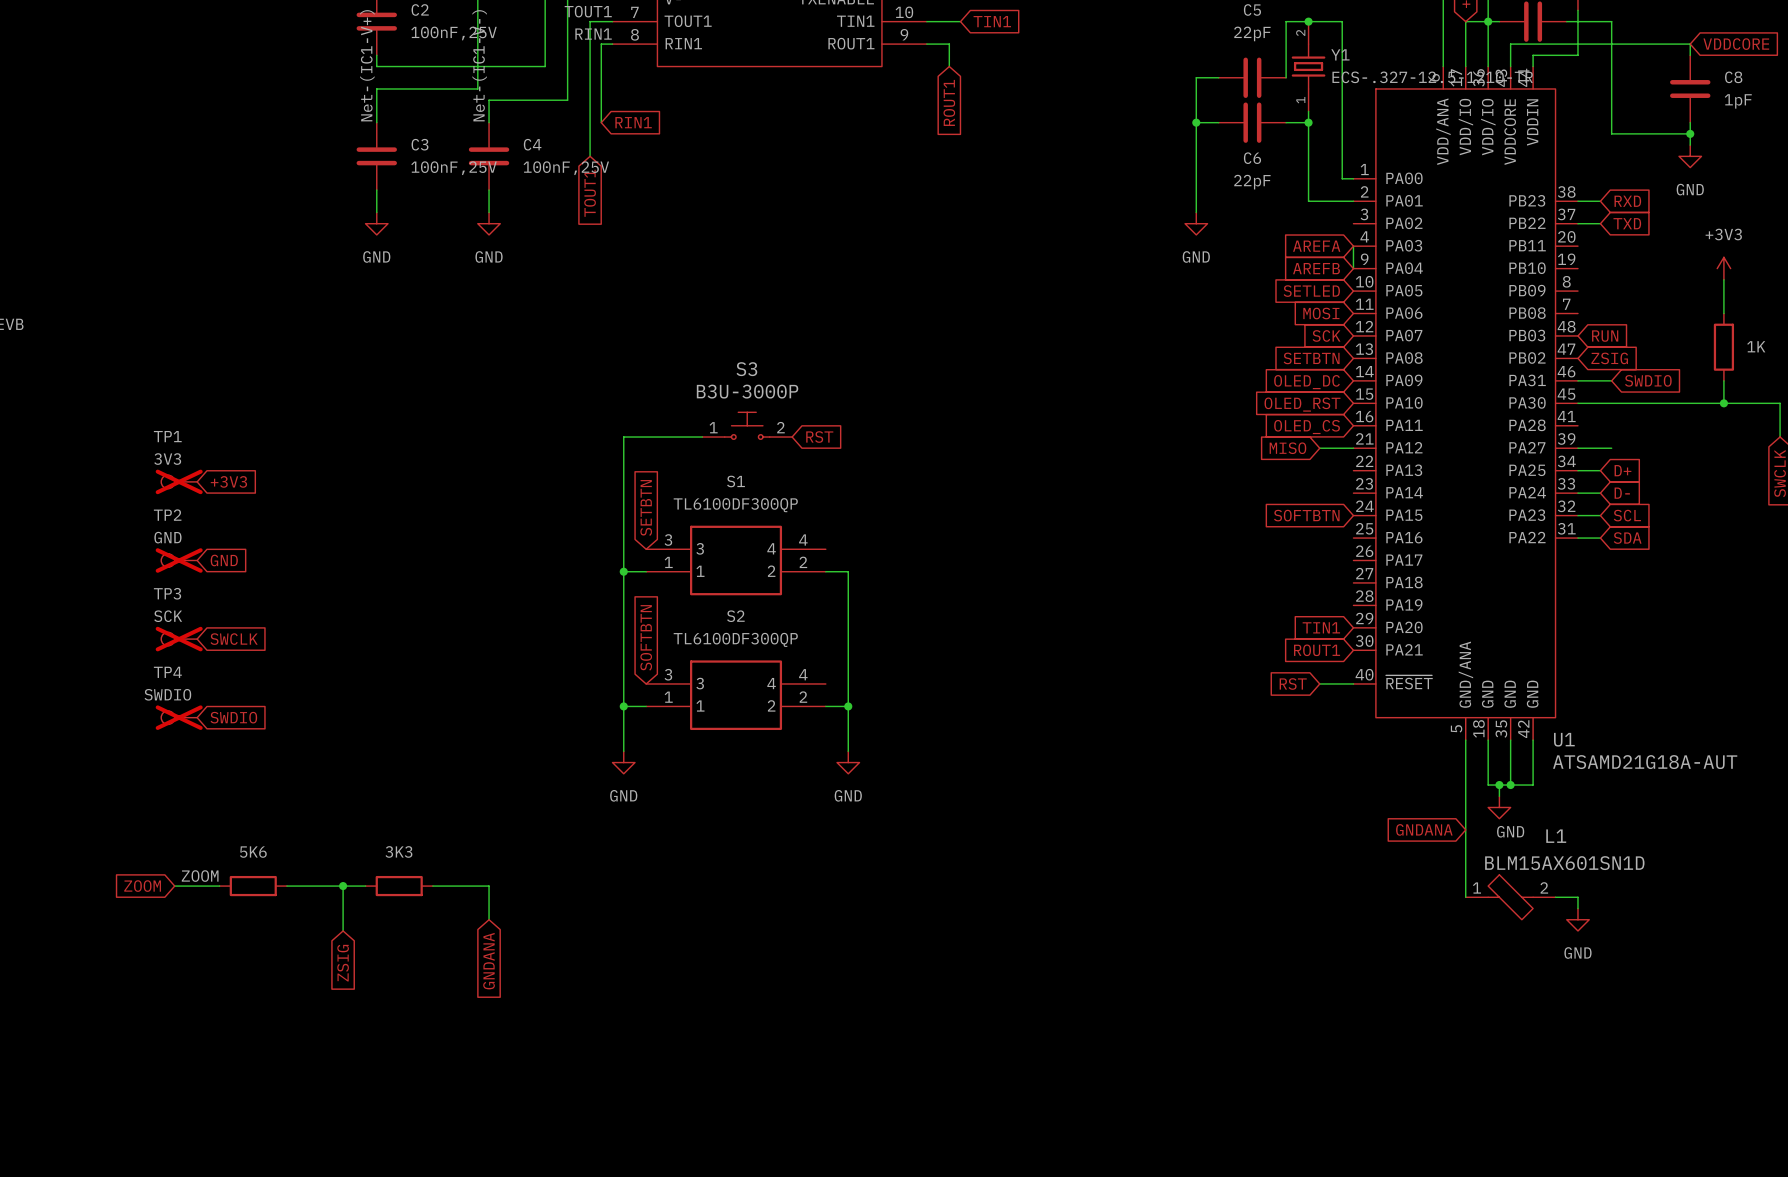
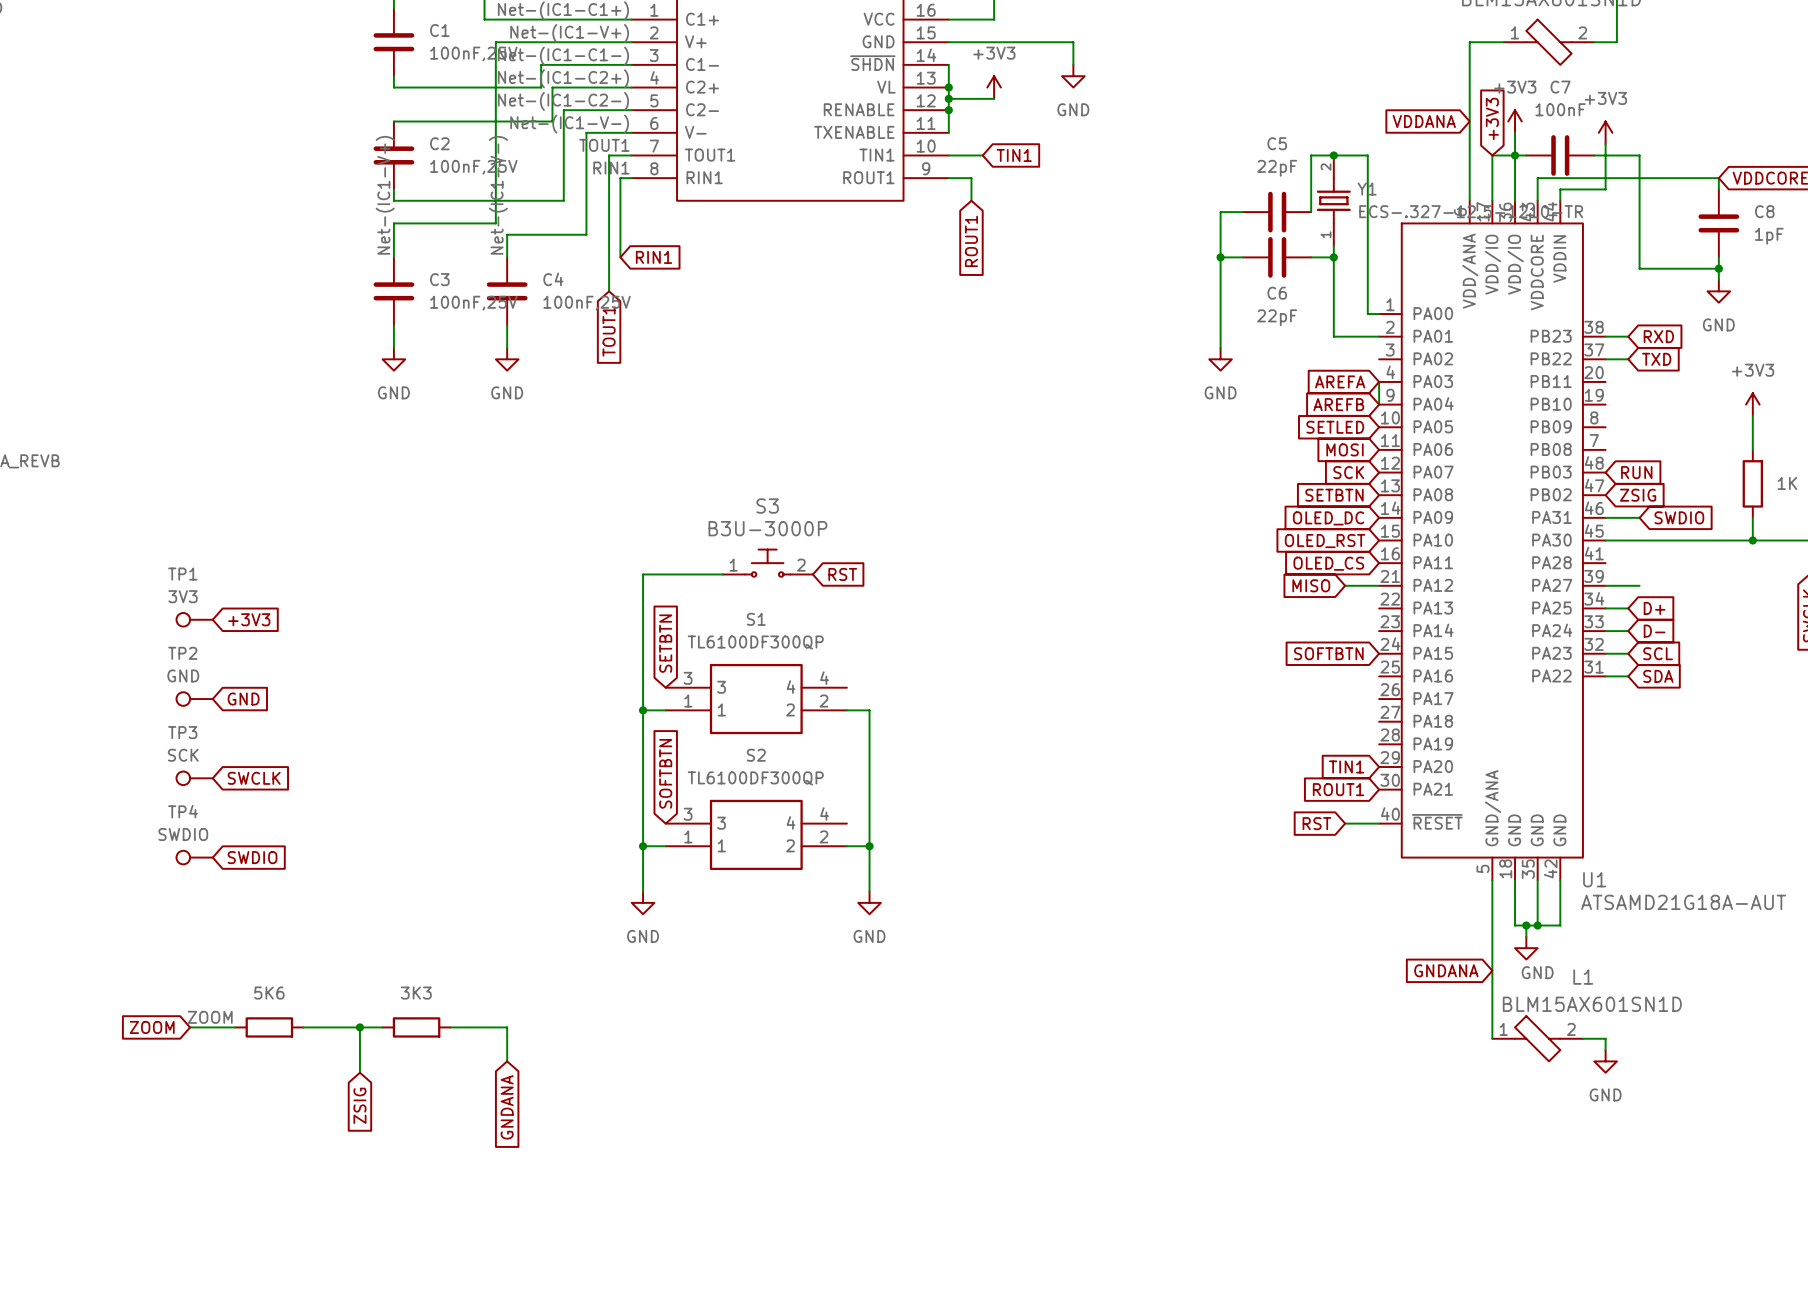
TP1 do-not-place cross: (179, 481) -> none
TP2 do-not-place cross: (179, 560) -> none
TP3 do-not-place cross: (179, 639) -> none
TP4 do-not-place cross: (179, 717) -> none

